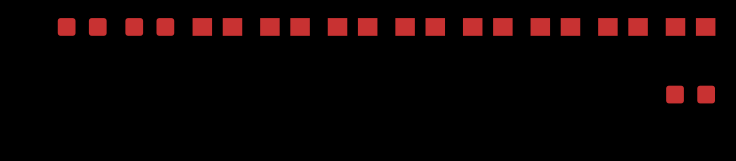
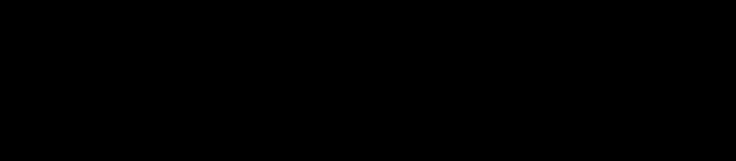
part: (82, 26) -> none
part: (149, 26) -> none
part: (217, 26) -> none
part: (284, 26) -> none
part: (352, 26) -> none
part: (420, 26) -> none
part: (487, 26) -> none
part: (555, 26) -> none
part: (622, 26) -> none
part: (690, 26) -> none
part: (690, 94) -> none

